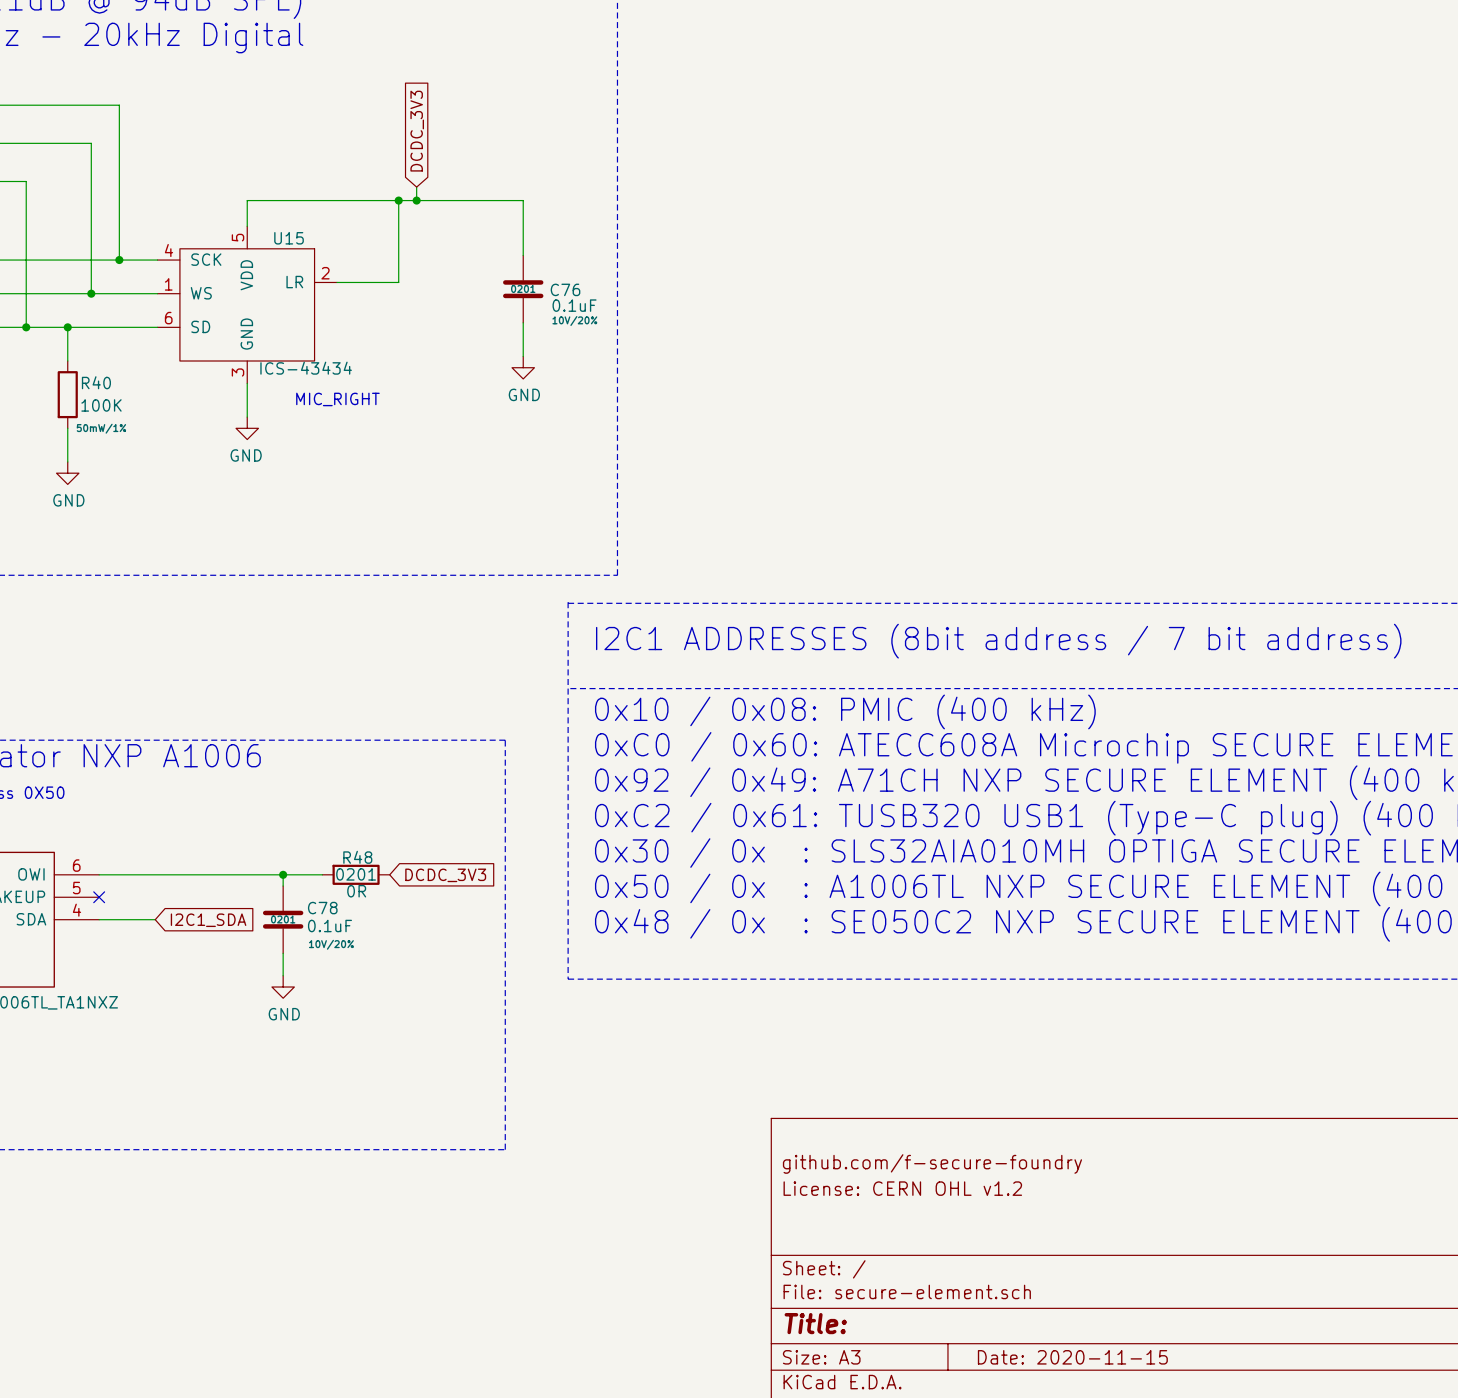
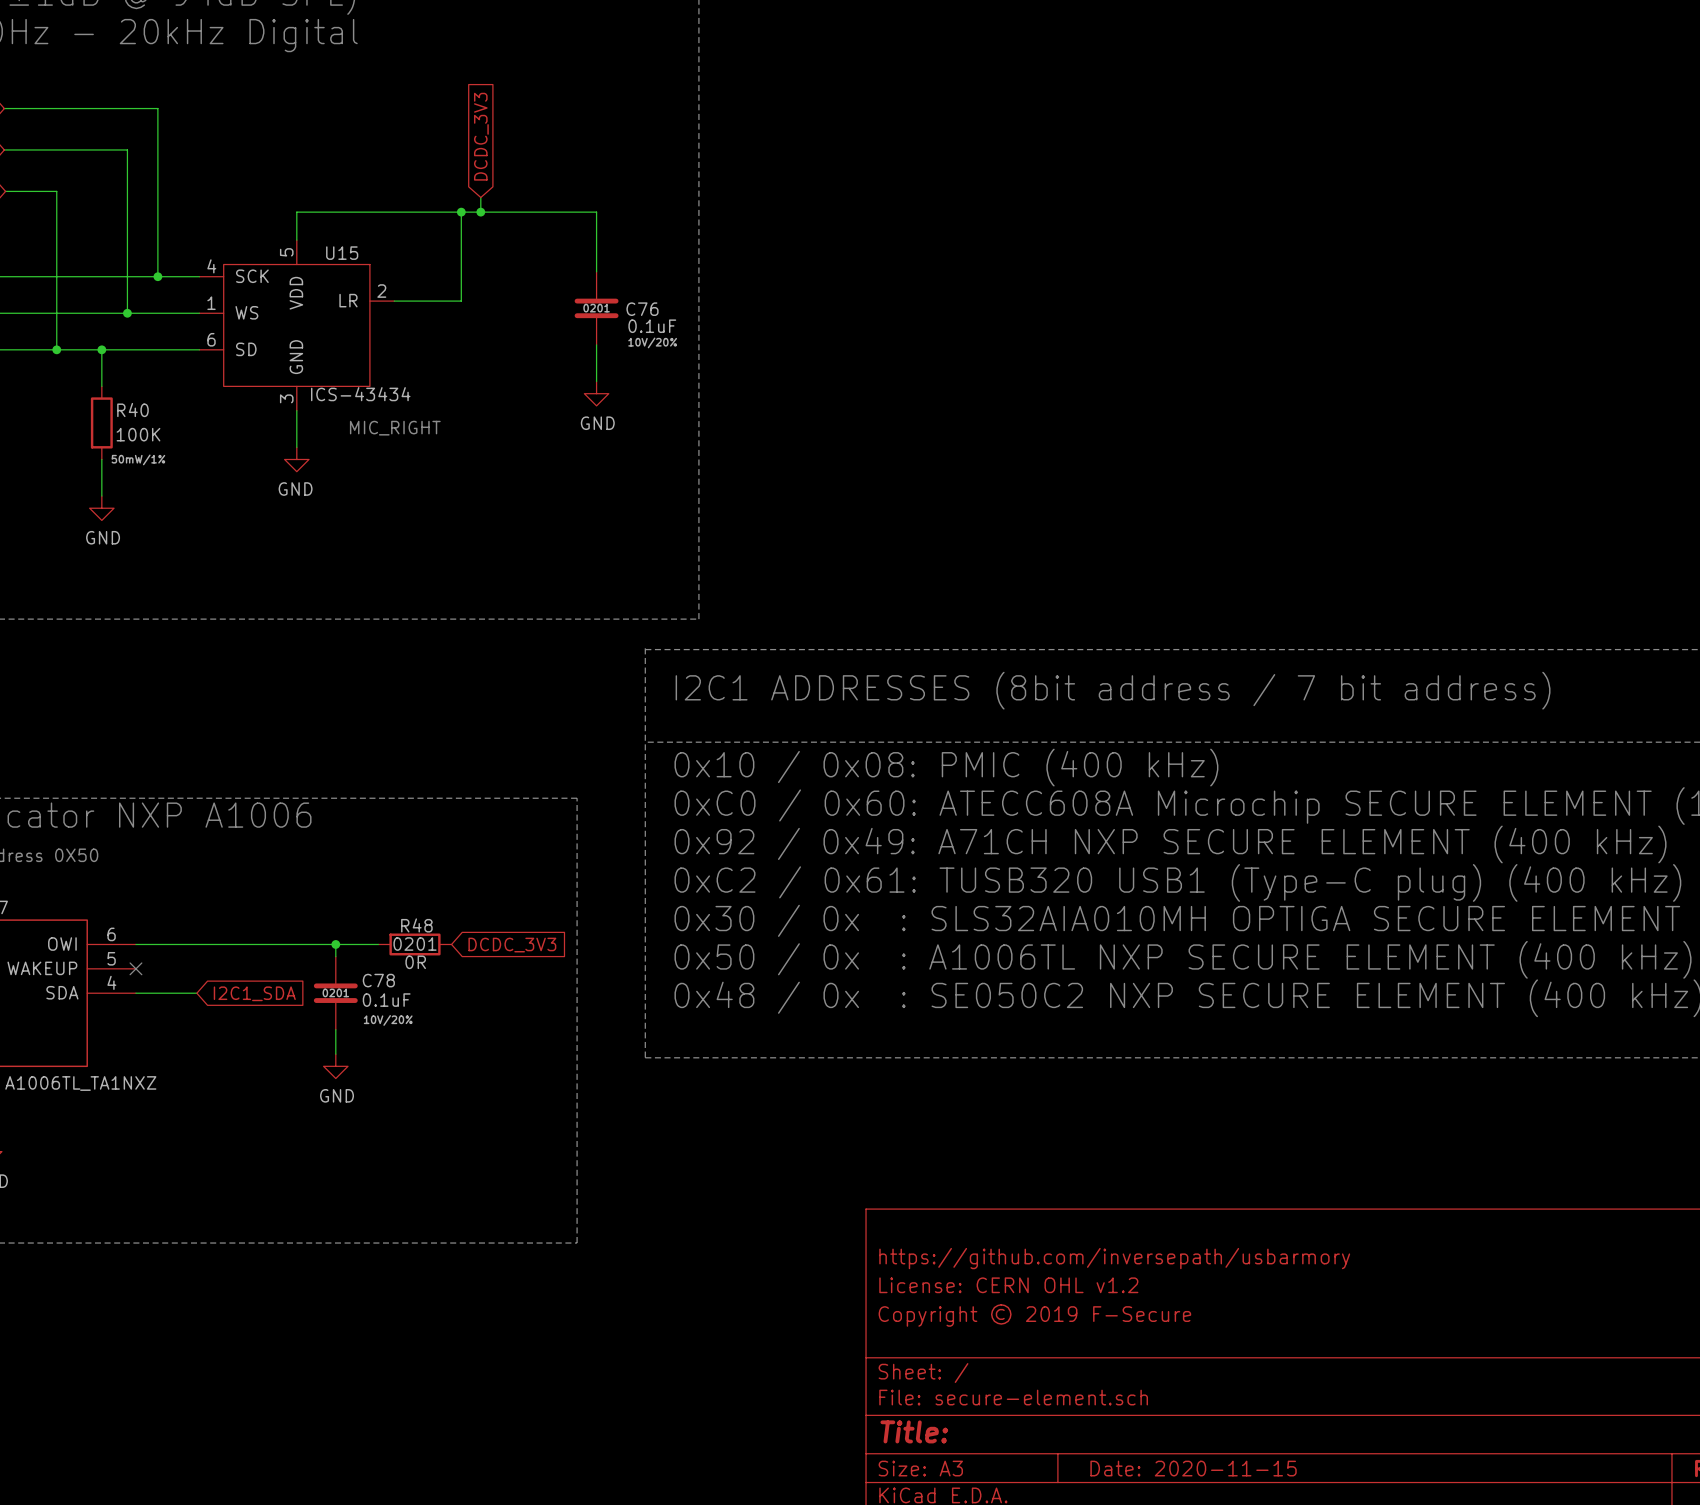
title block: github.com/f-secure-foundry (932, 1163) -> https://github.com/inversepath/usbarmory (1114, 1258)
title block: none -> Copyright © 2019 F-Secure (1034, 1315)

